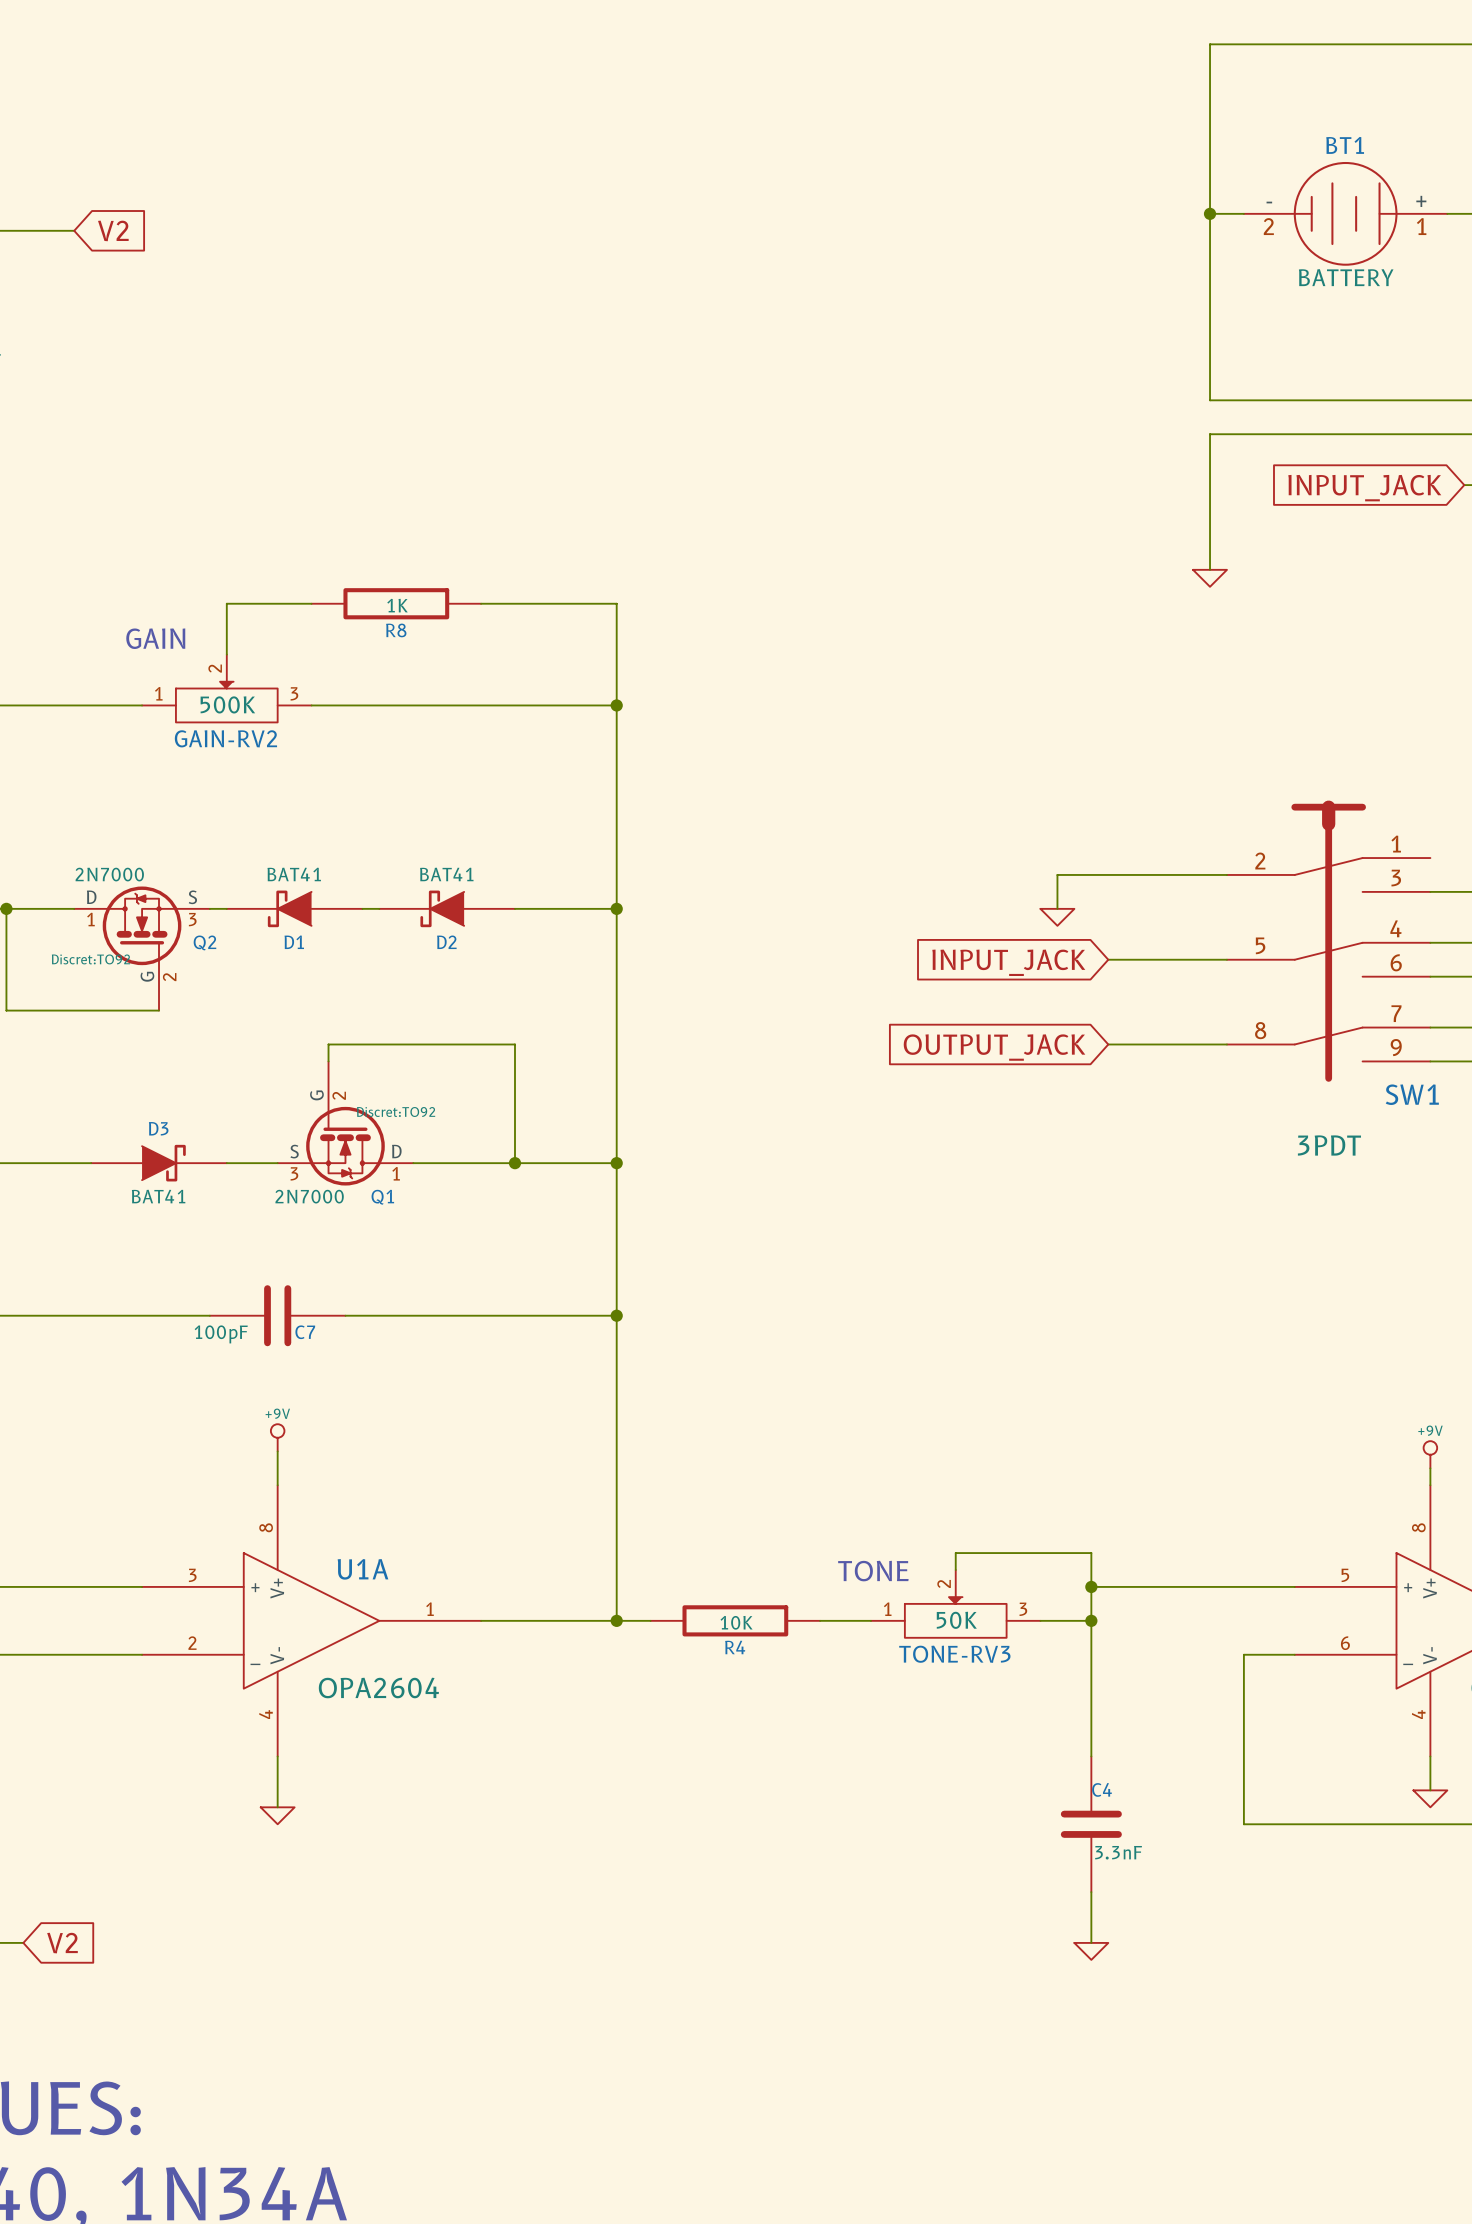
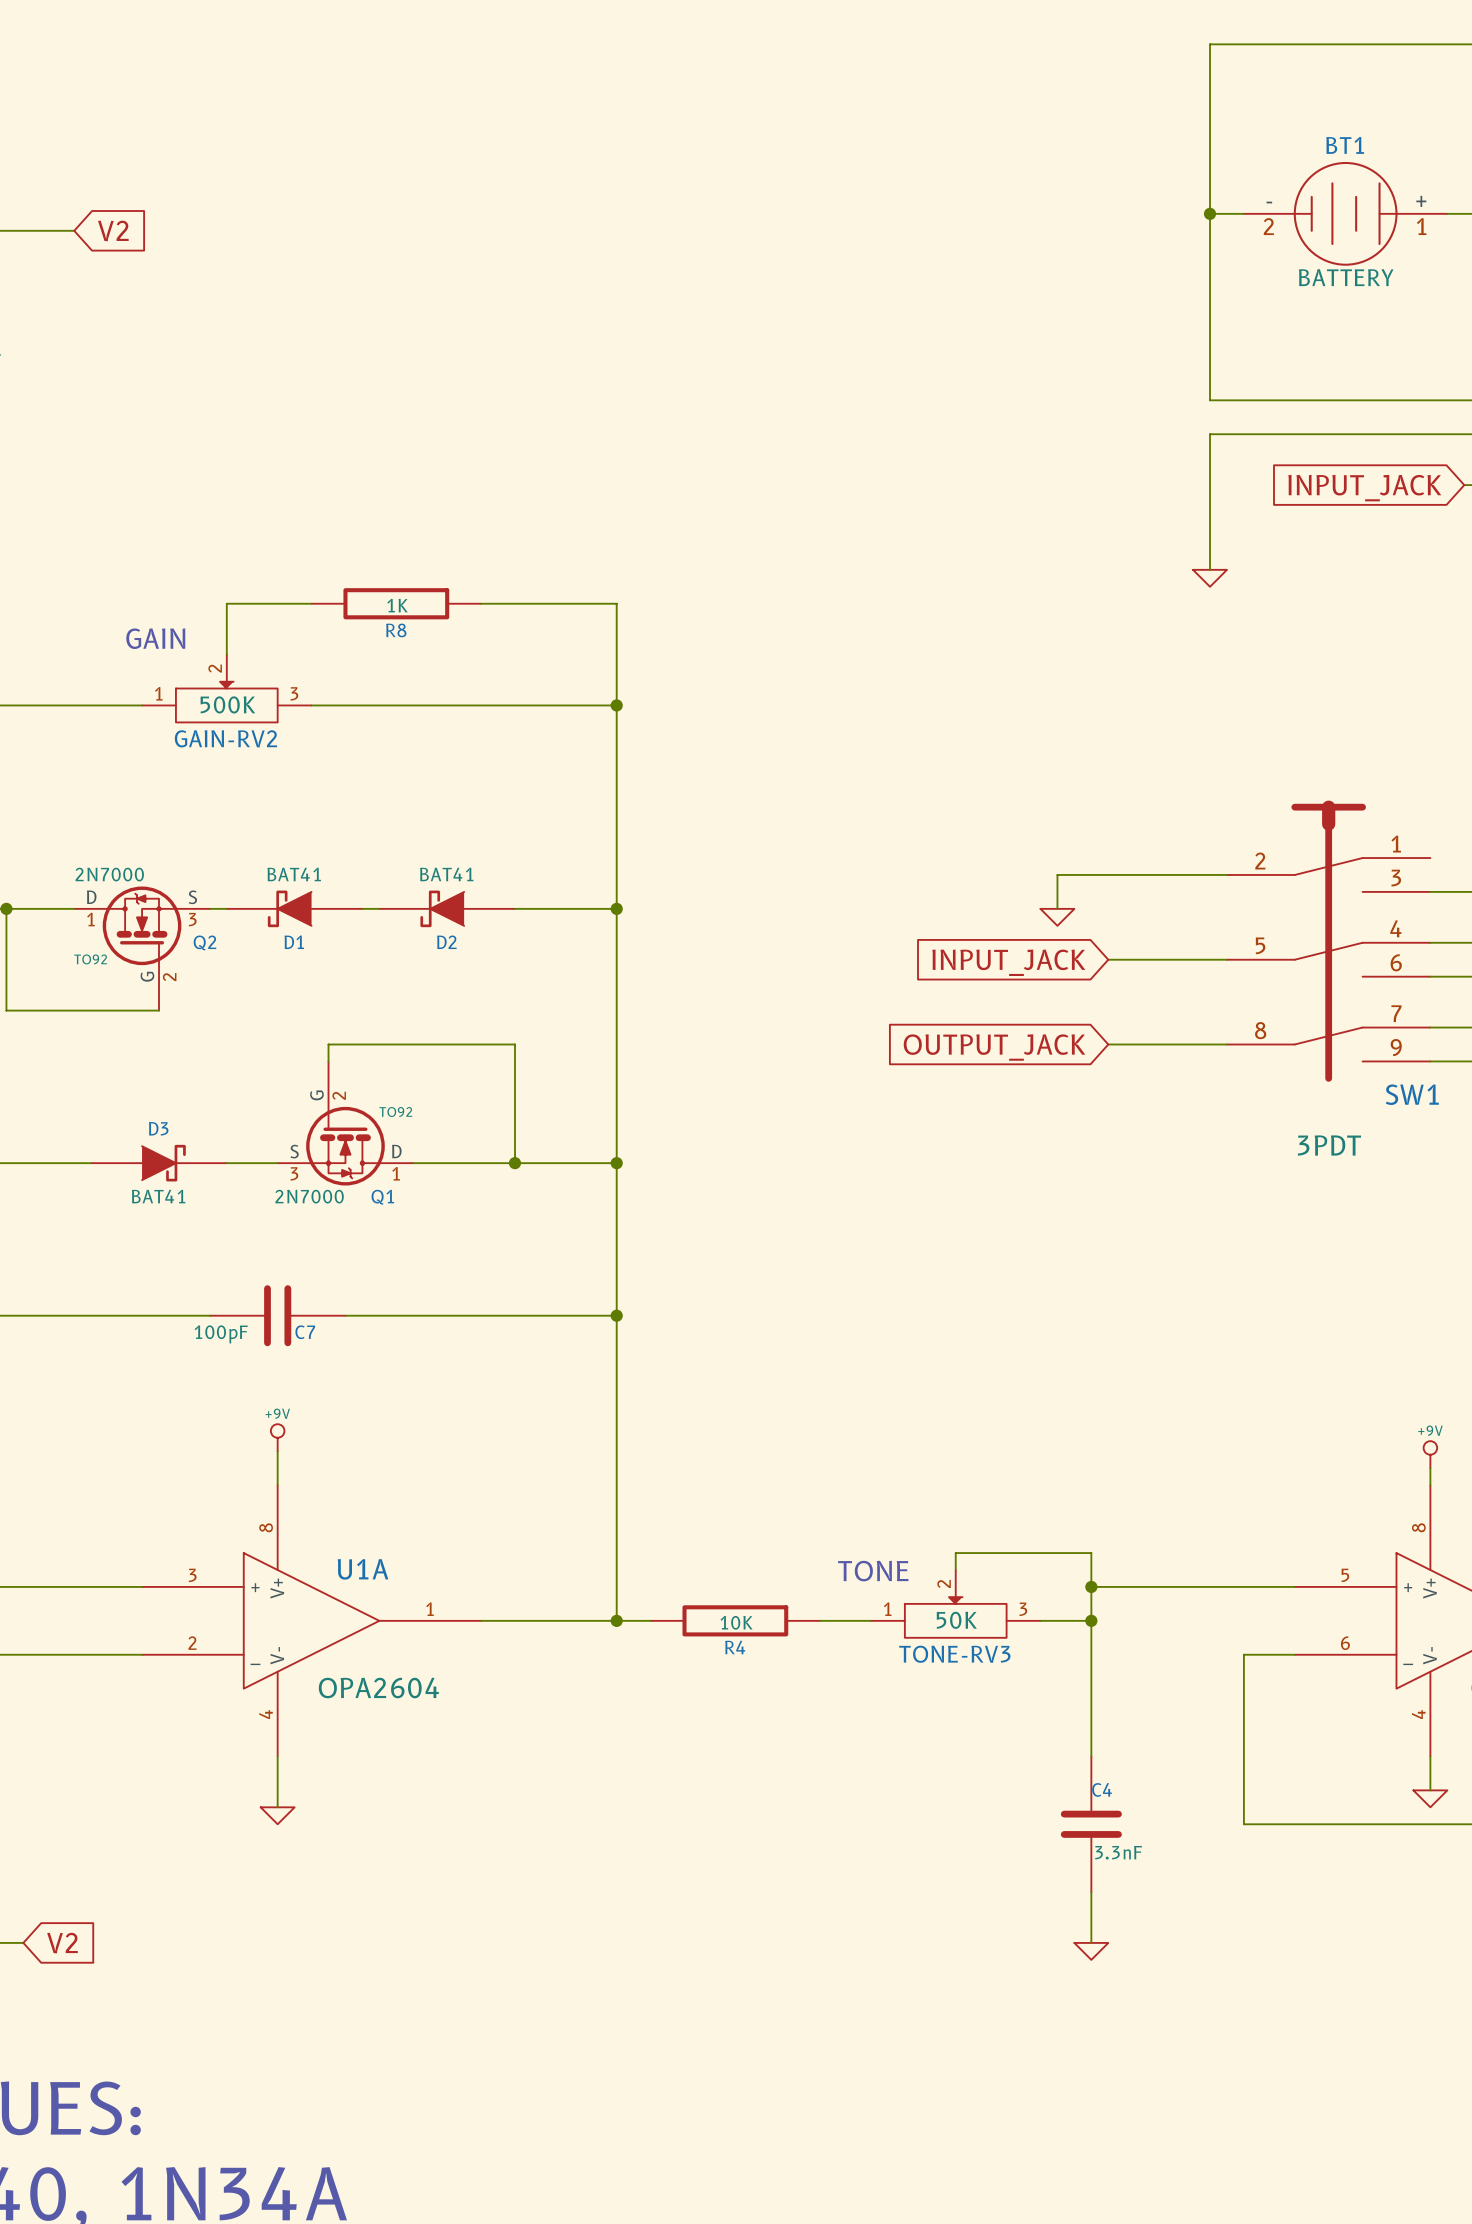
Q2 text: Discret:TO92 (90, 959) -> TO92 (90, 959)
Q1 text: Discret:TO92 (396, 1112) -> TO92 (395, 1112)

